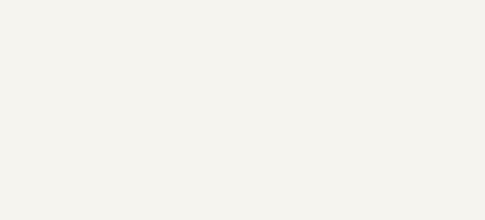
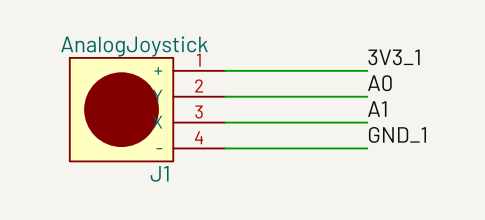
label: none -> 3V3_1 (394, 57)
wire: none -> (225, 70) (367, 70)
label: none -> A0 (379, 83)
wire: none -> (225, 96) (367, 96)
J1: none -> AnalogJoystick (147, 109)
label: none -> A1 (377, 109)
wire: none -> (225, 122) (367, 122)
label: none -> GND_1 (397, 134)
wire: none -> (225, 148) (367, 148)

